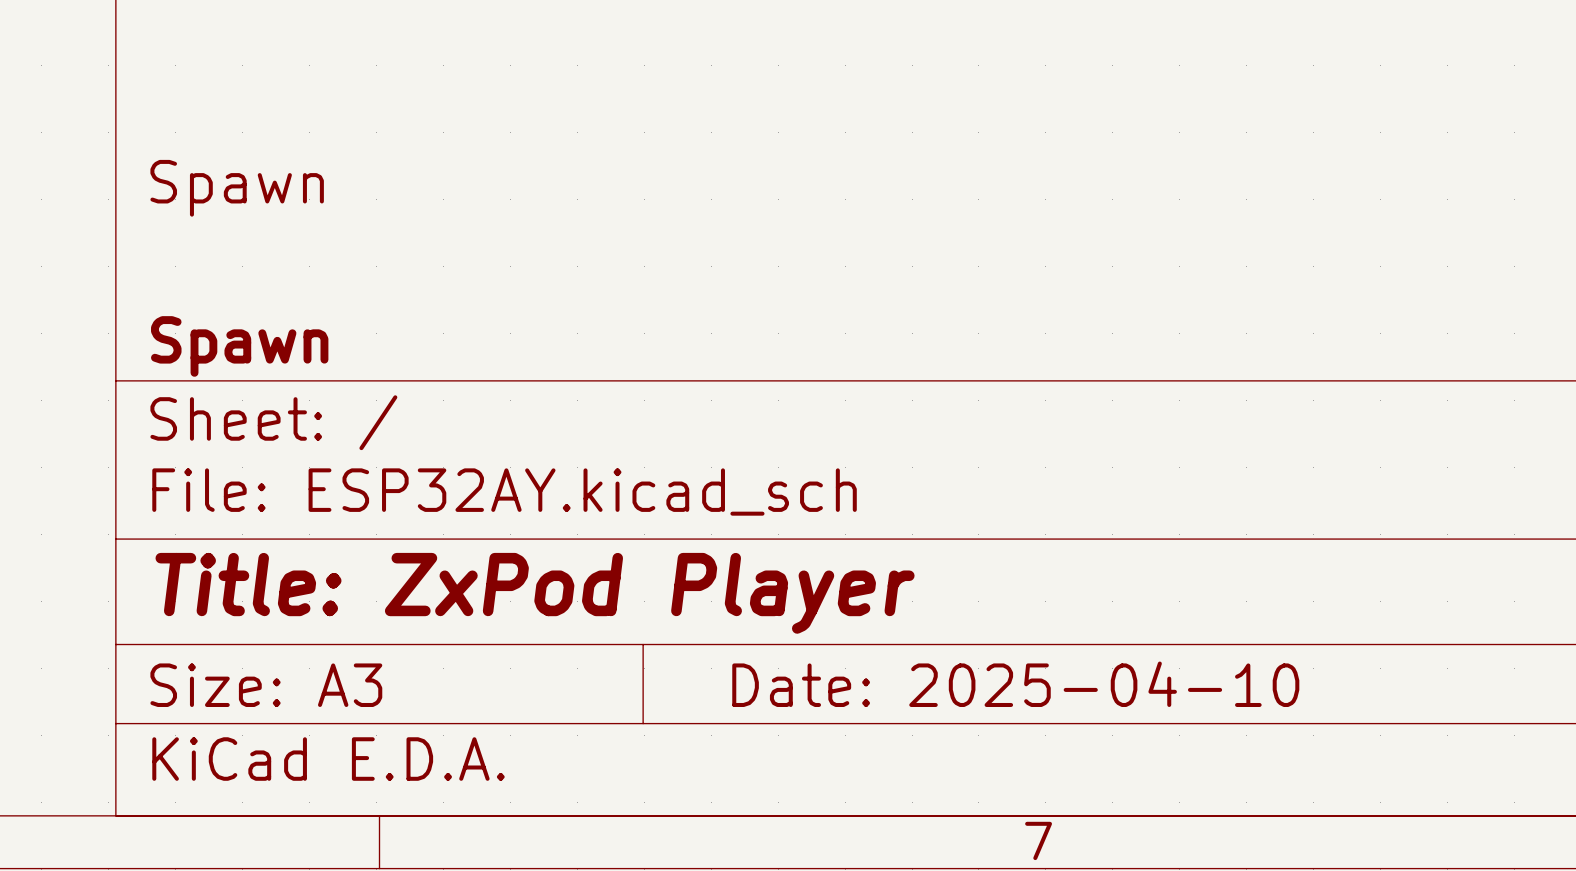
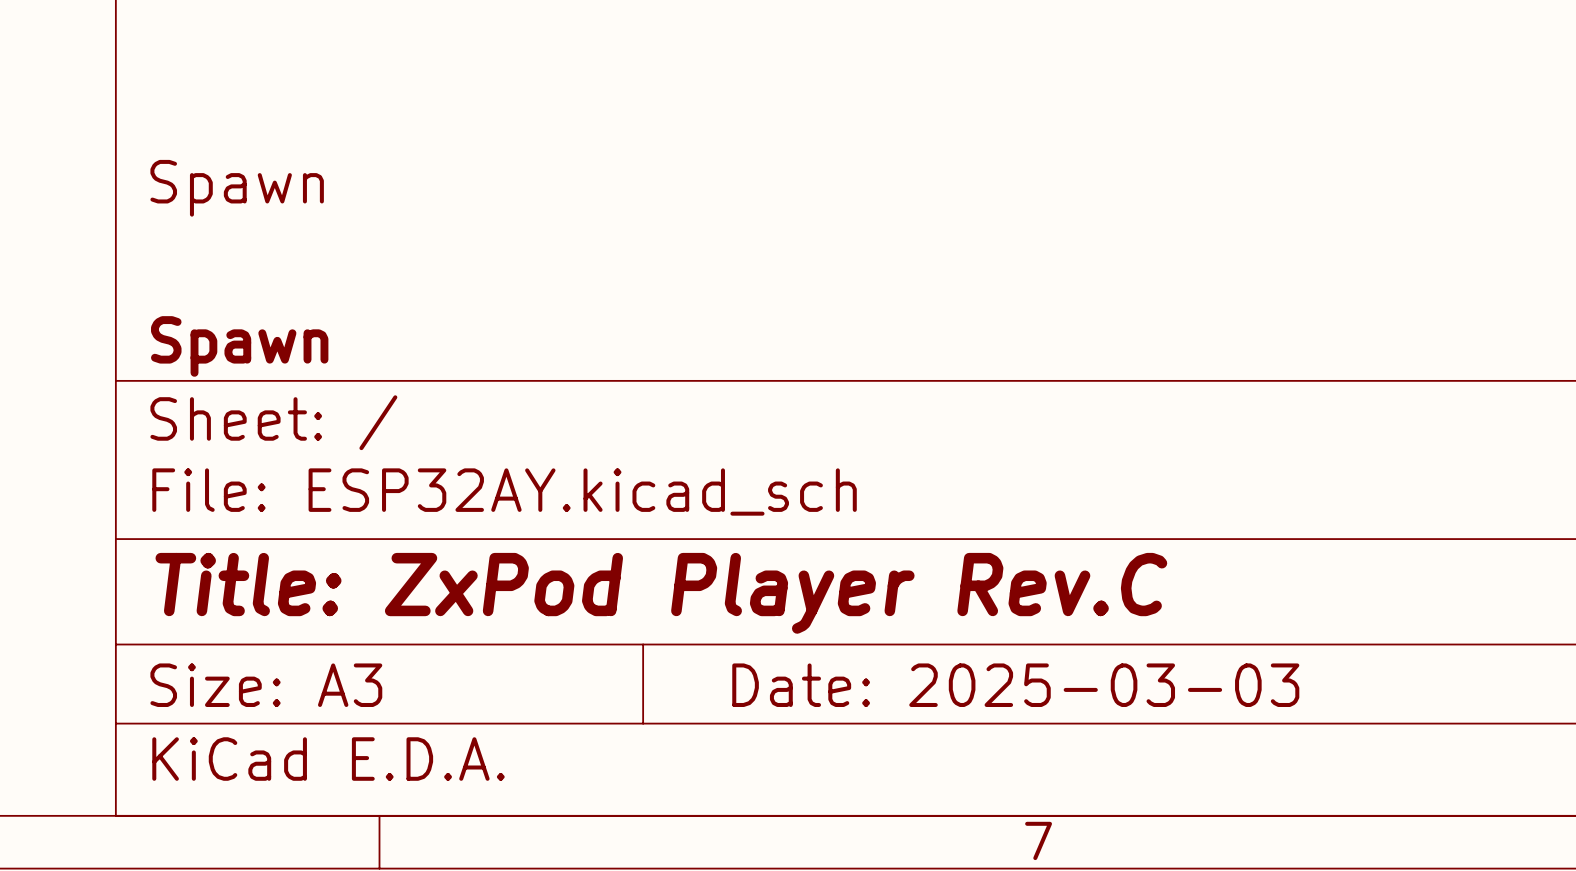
title block: Title: ZxPod Player (535, 593) -> Title: ZxPod Player Rev.C (661, 593)
title block: Date: 2025-04-10 (1015, 684) -> Date: 2025-03-03 (1015, 685)

